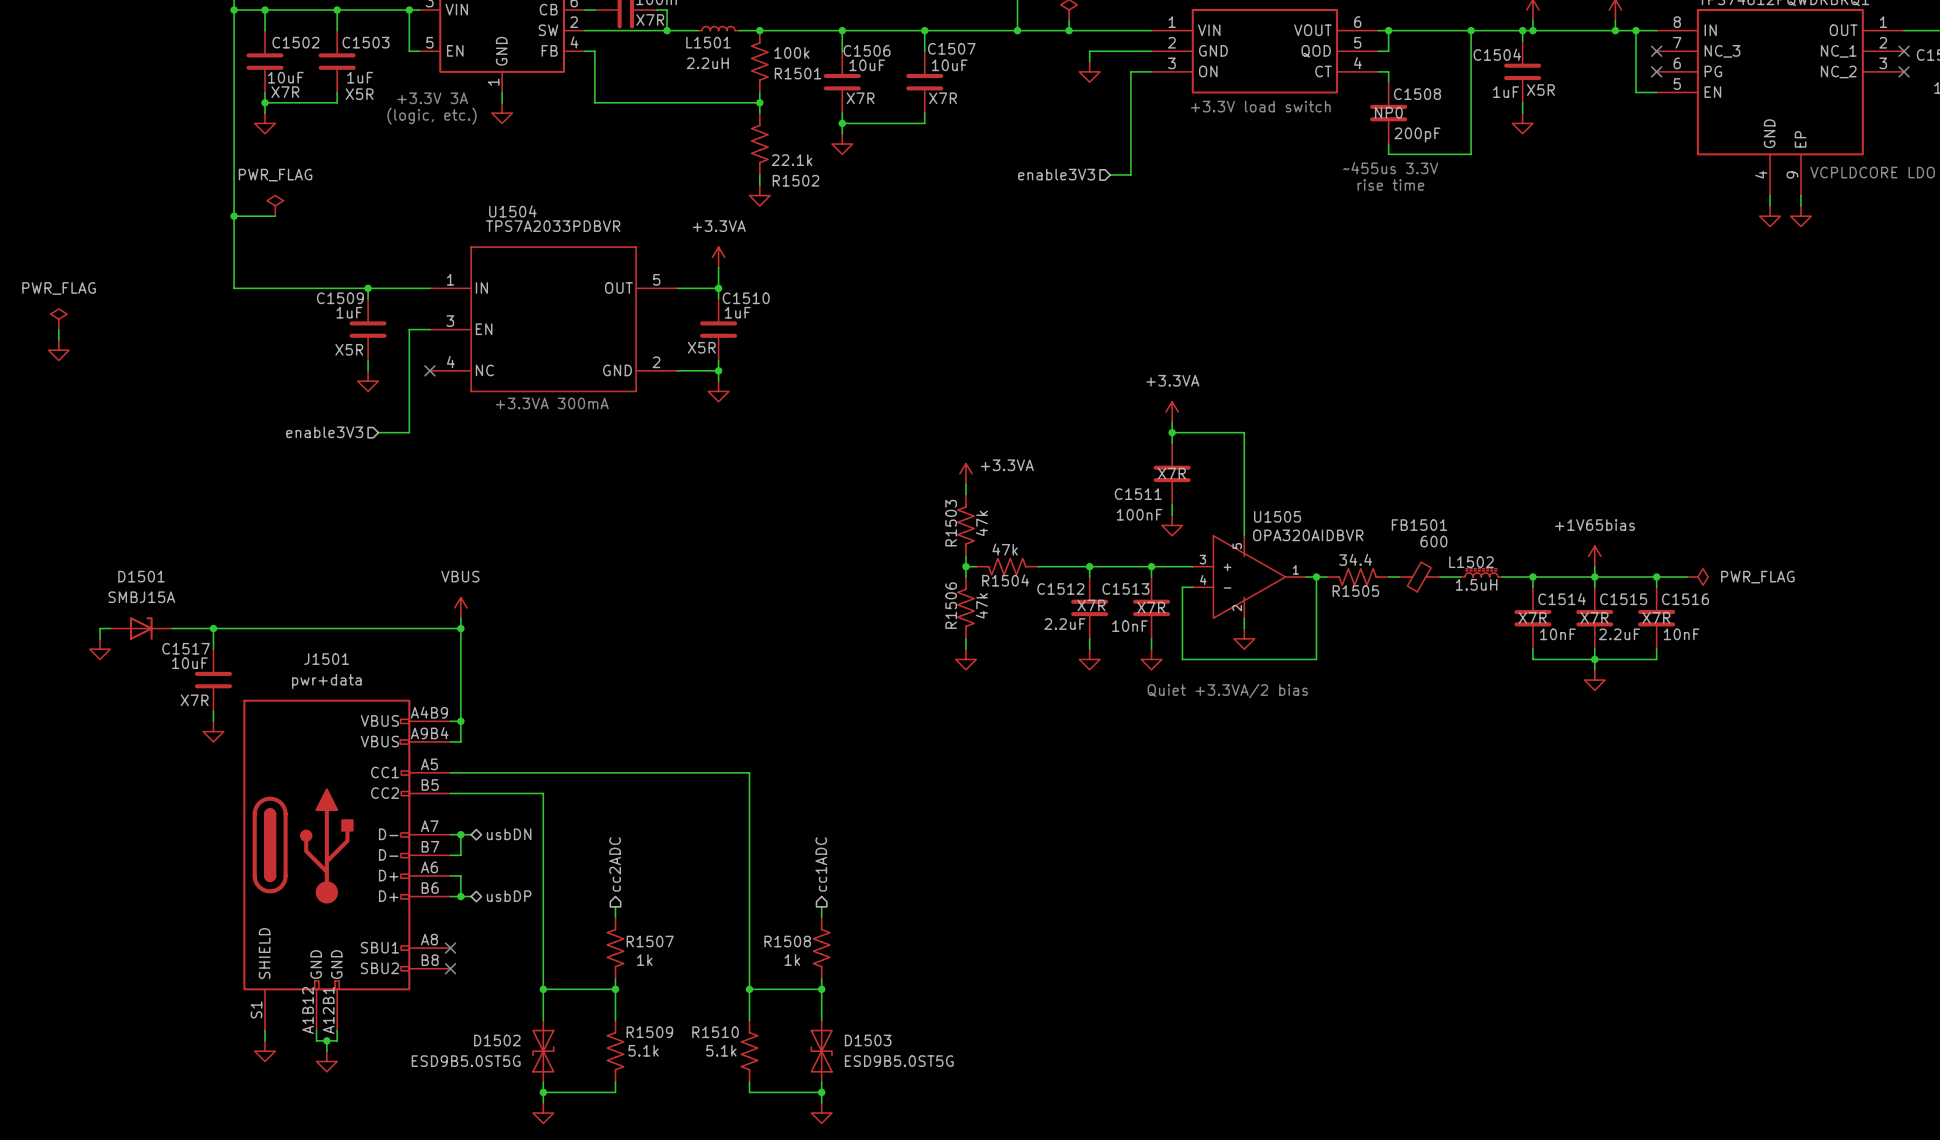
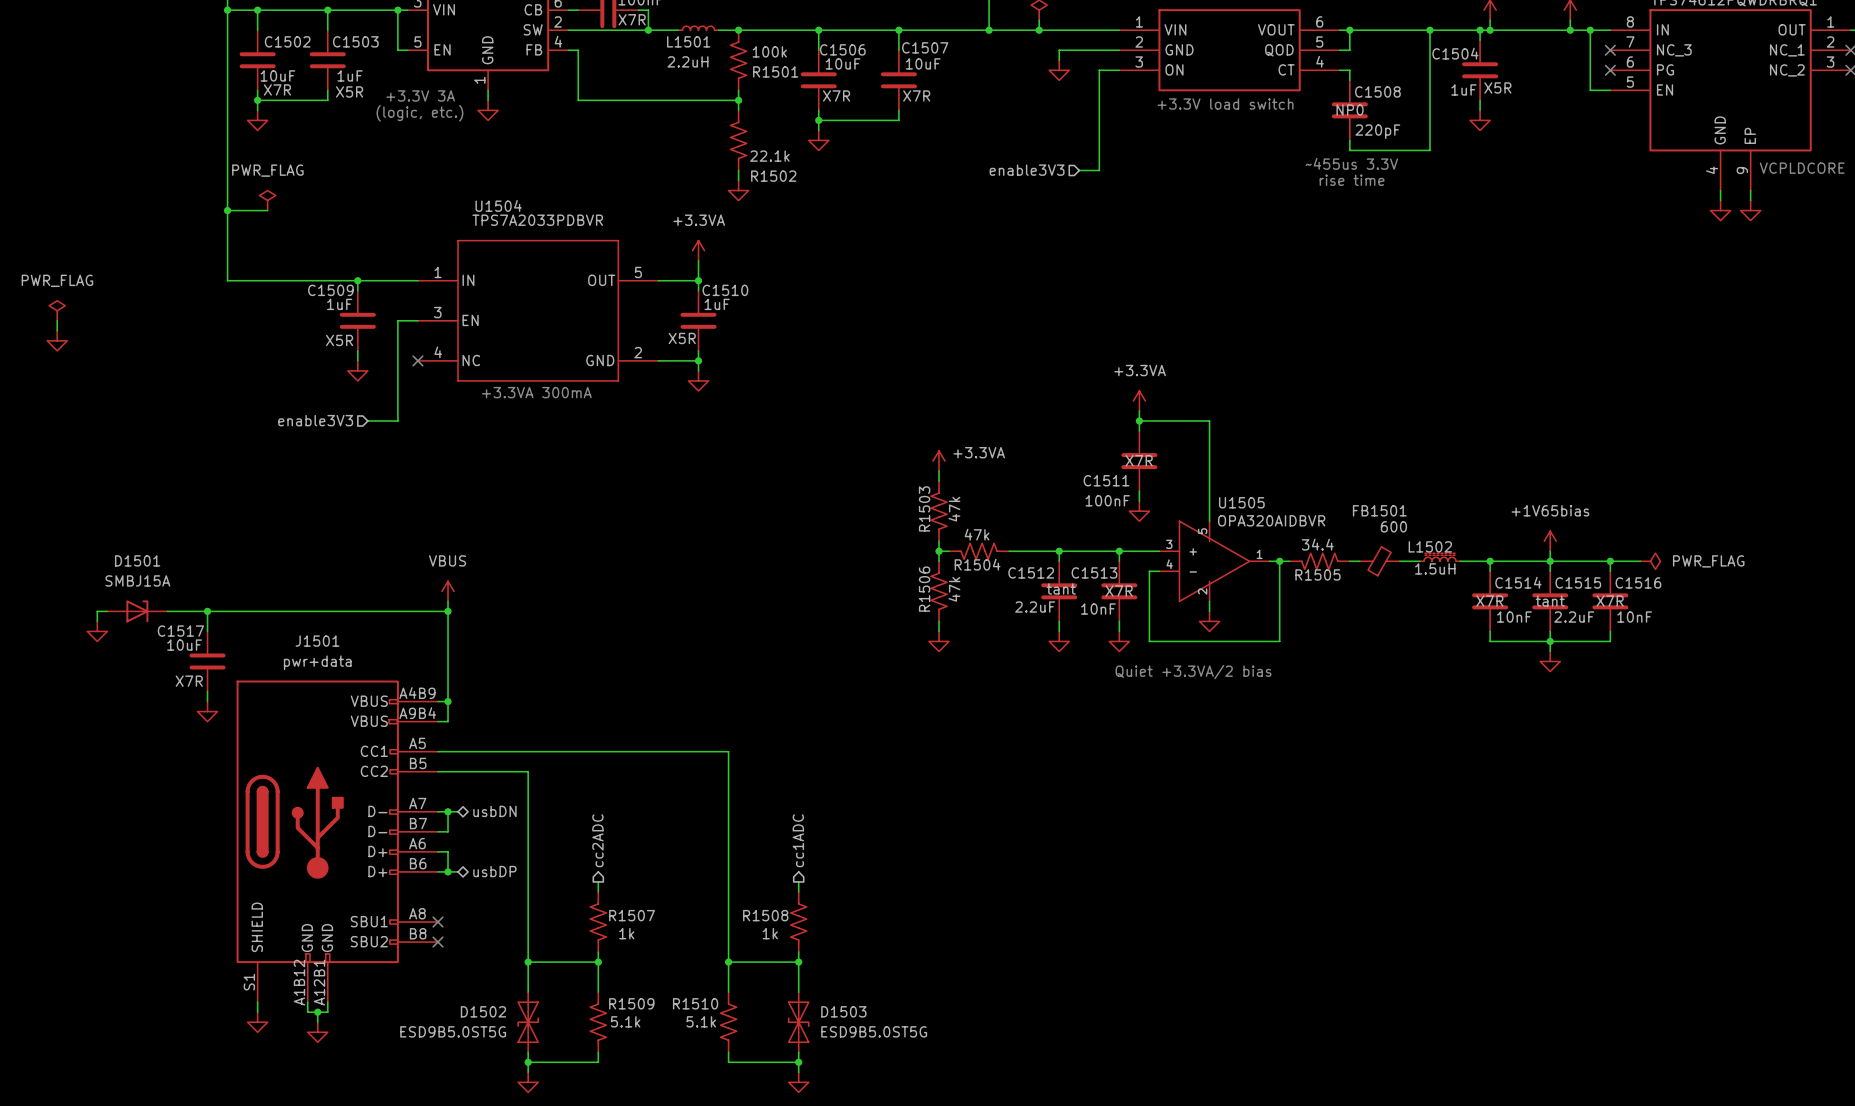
C1508 value: 200pF (1417, 135) -> 220pF (1377, 131)
C1512 text: X7R (1091, 605) -> tant (1061, 588)
C1515 text: X7R (1594, 617) -> tant (1550, 600)

